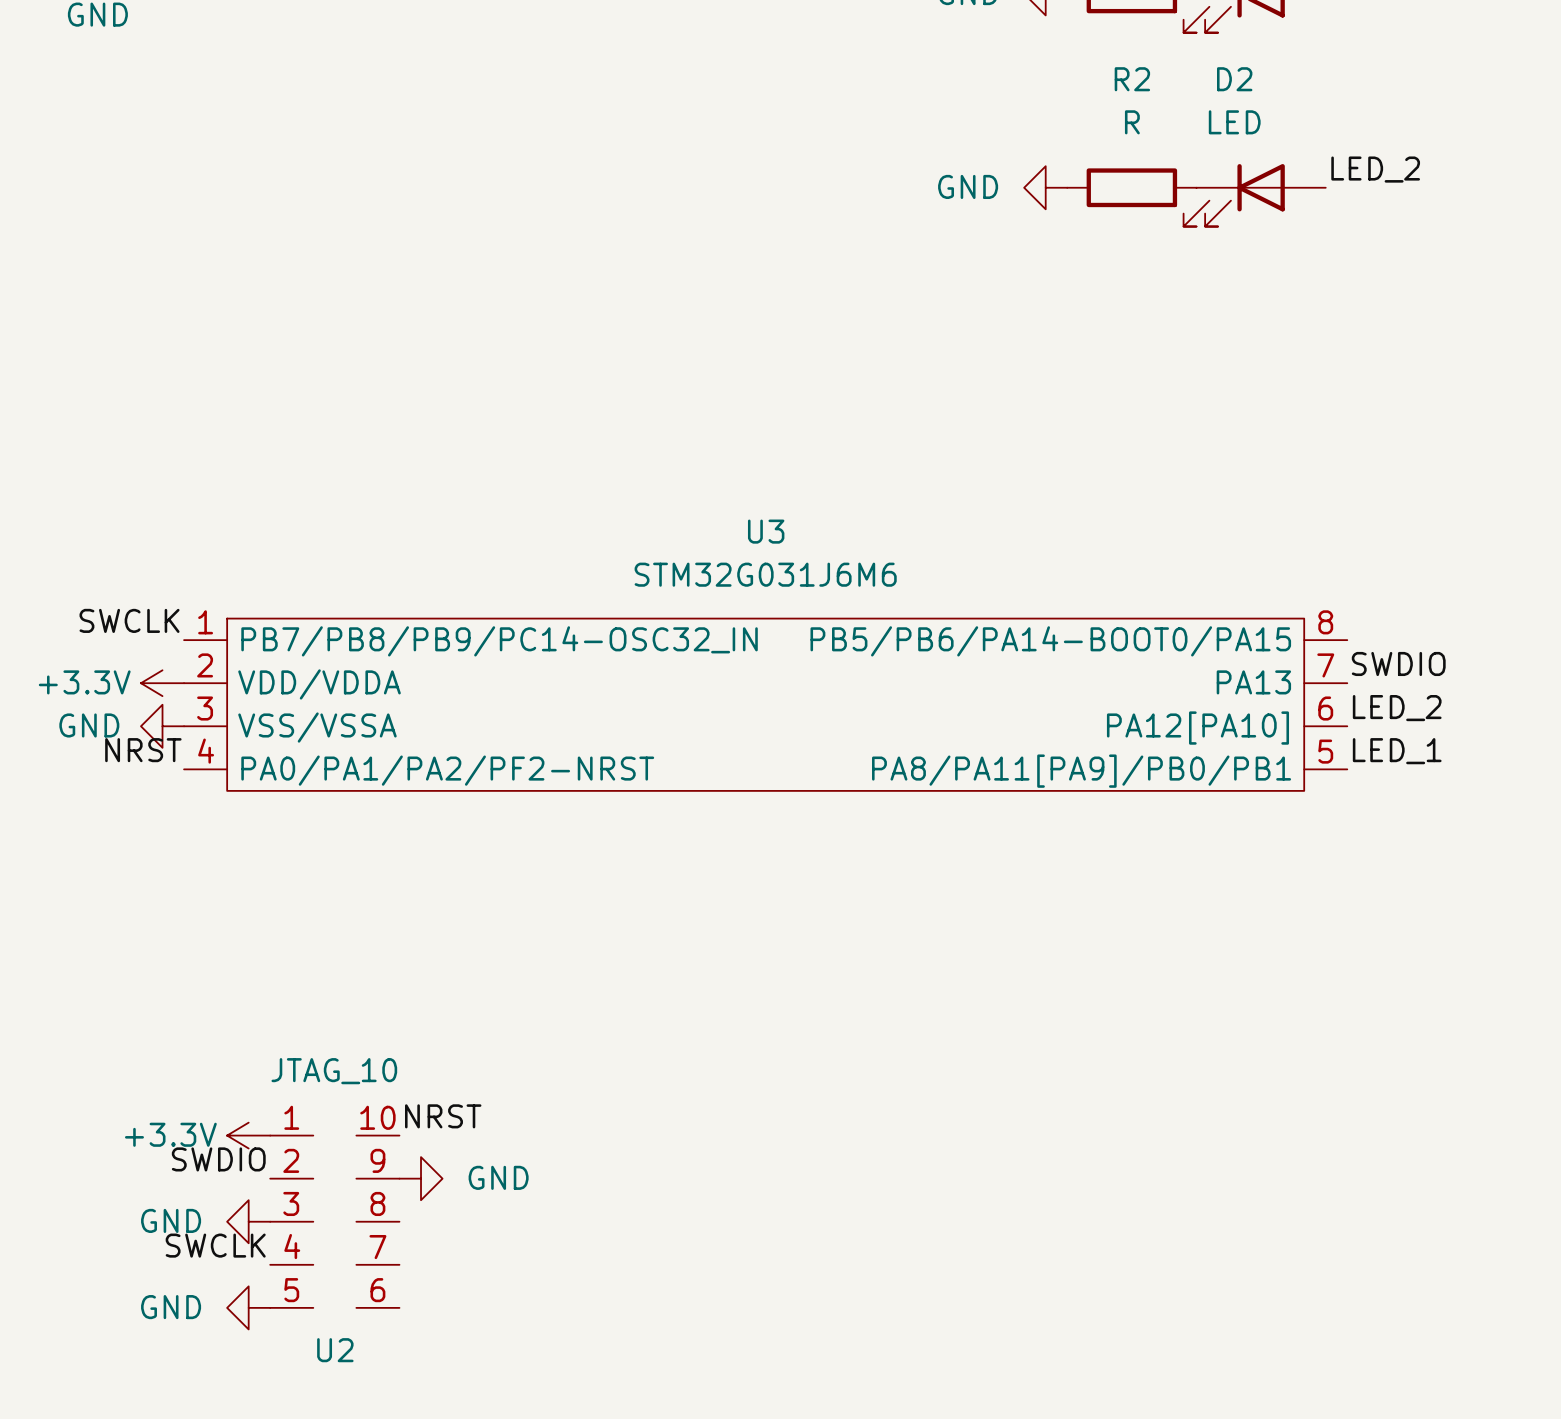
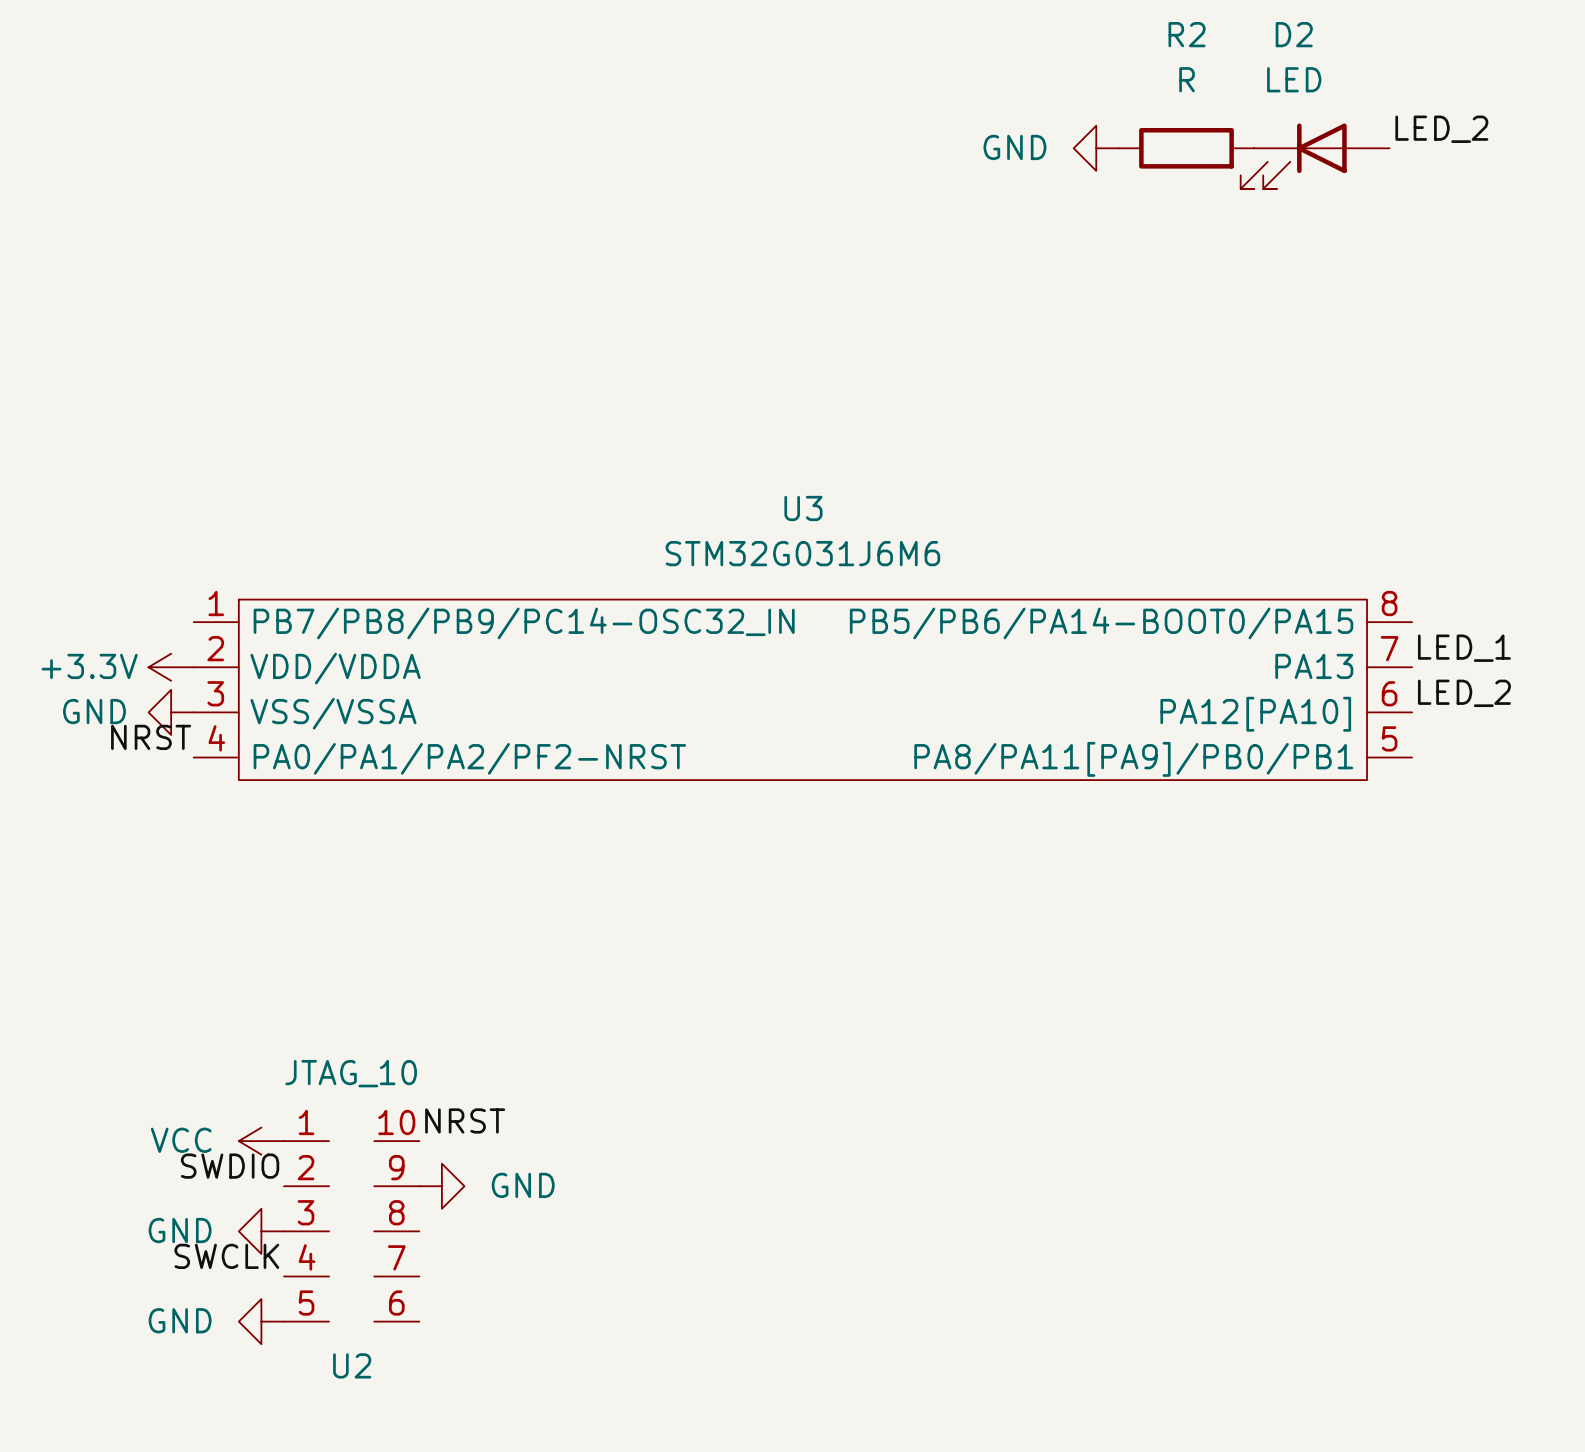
label: SWCLK (129, 620) -> none
label: SWDIO (1398, 663) -> LED_1 (1464, 648)
label: LED_1 (1397, 751) -> none
power symbol: +3.3V (248, 1135) -> VCC (261, 1141)

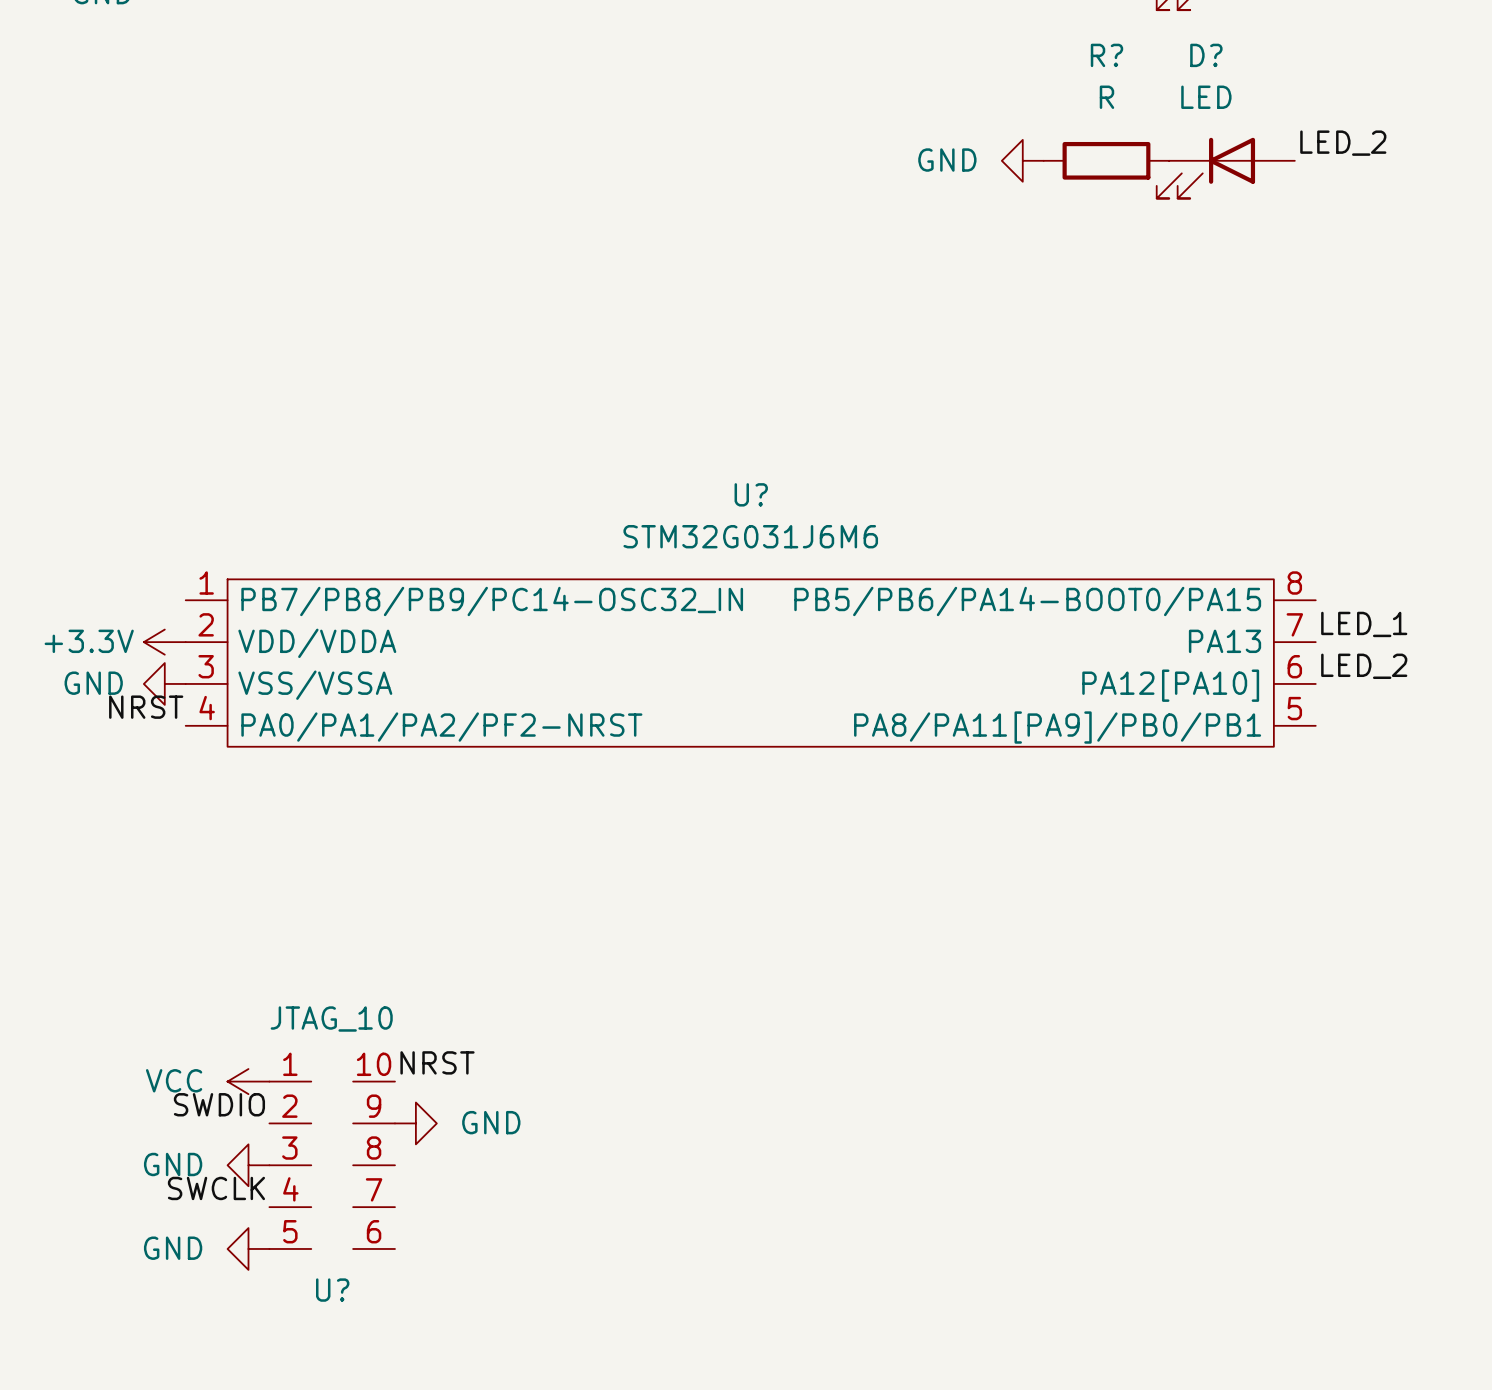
R2 name: R2 (1187, 34) -> R? (1106, 55)
D2 name: D2 (1294, 34) -> D? (1206, 55)
U3 name: U3 (803, 508) -> U? (751, 494)
U2 name: U2 (352, 1365) -> U? (332, 1290)

